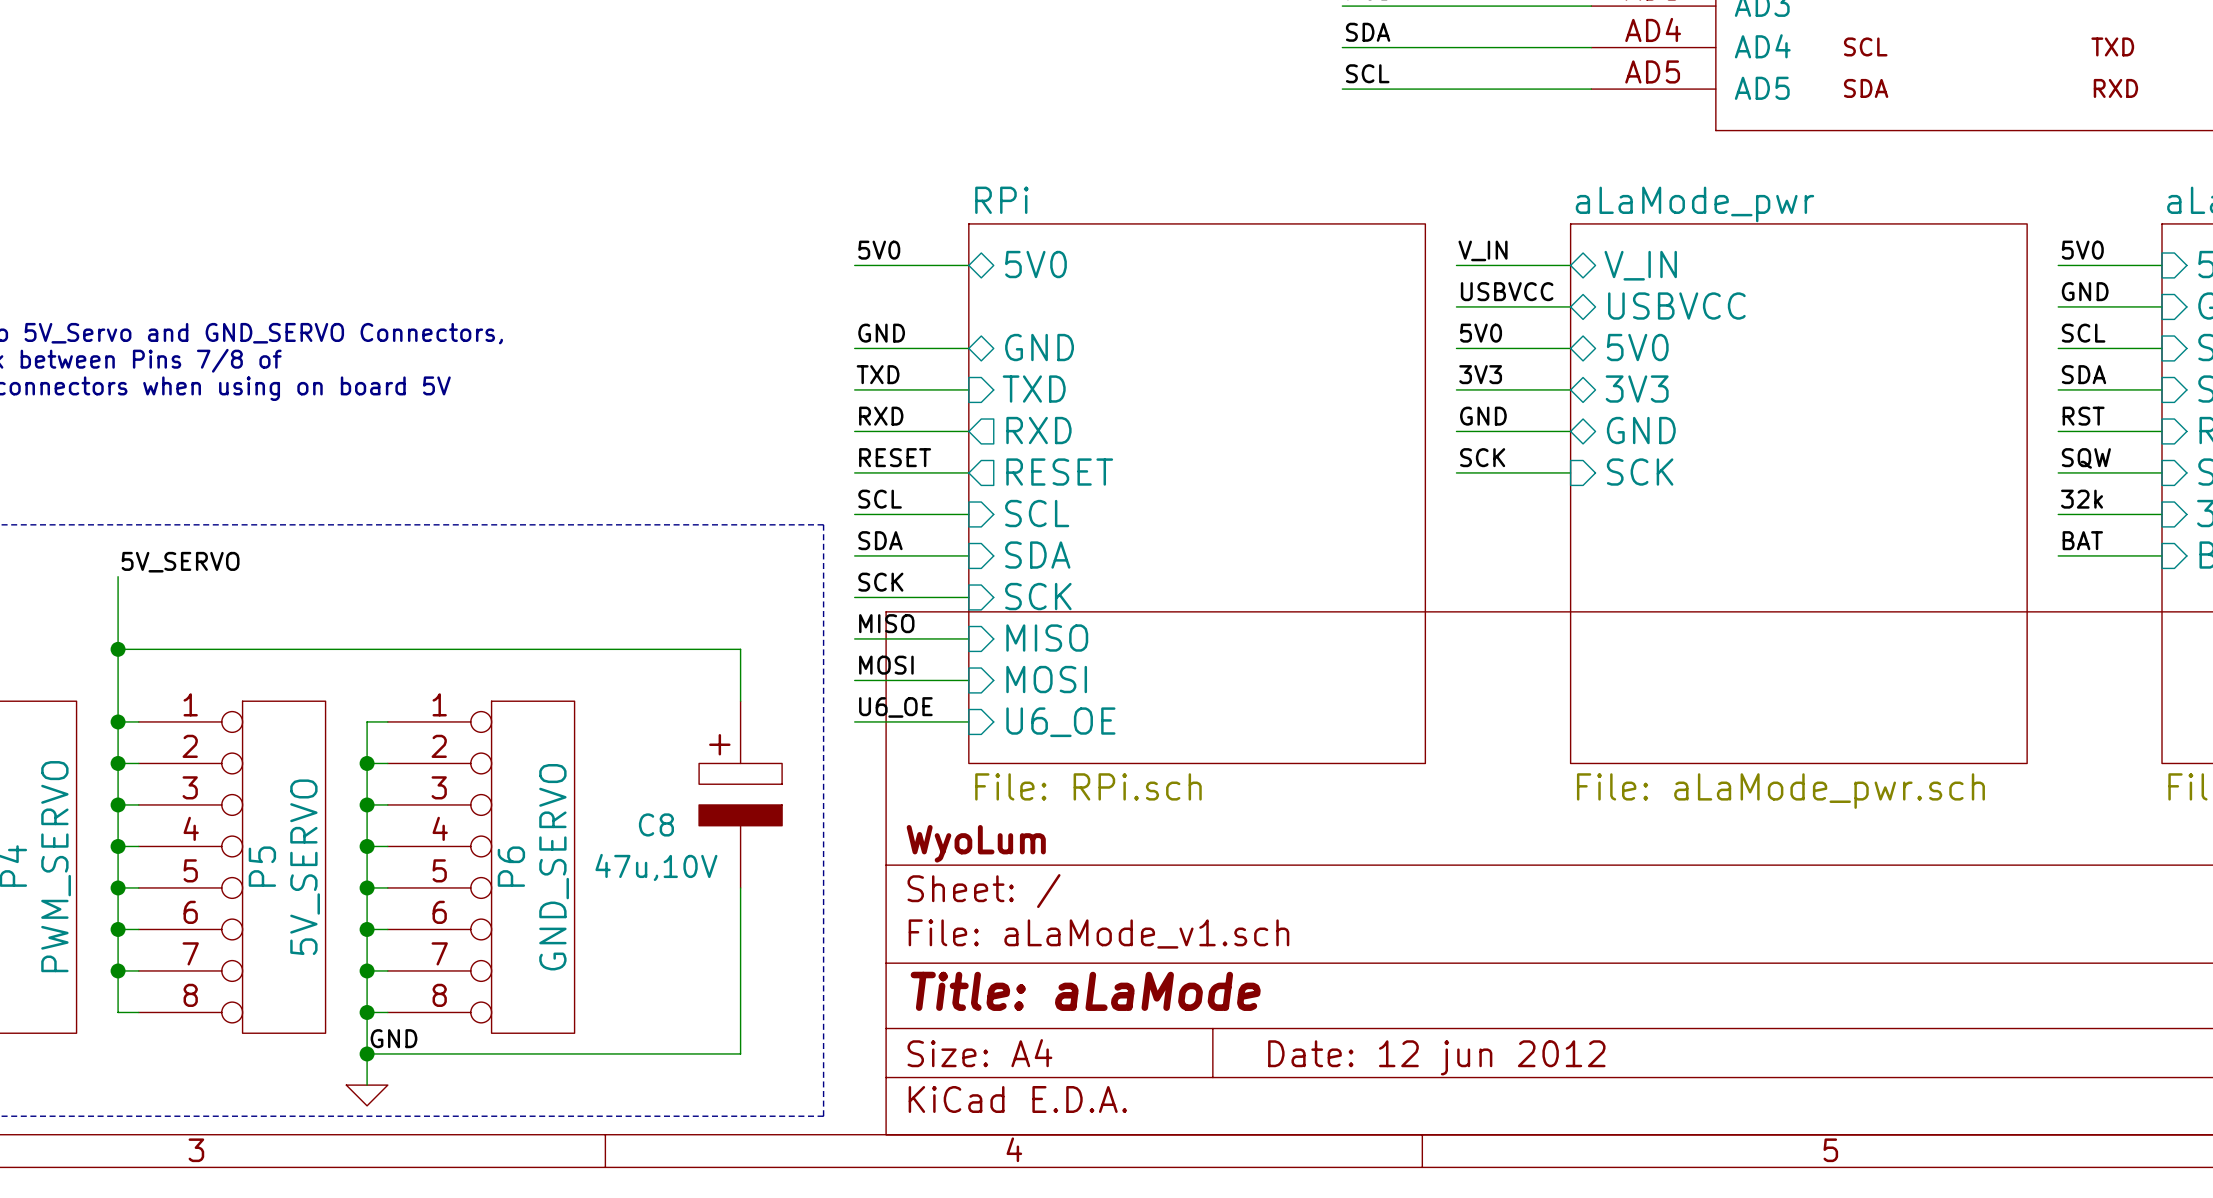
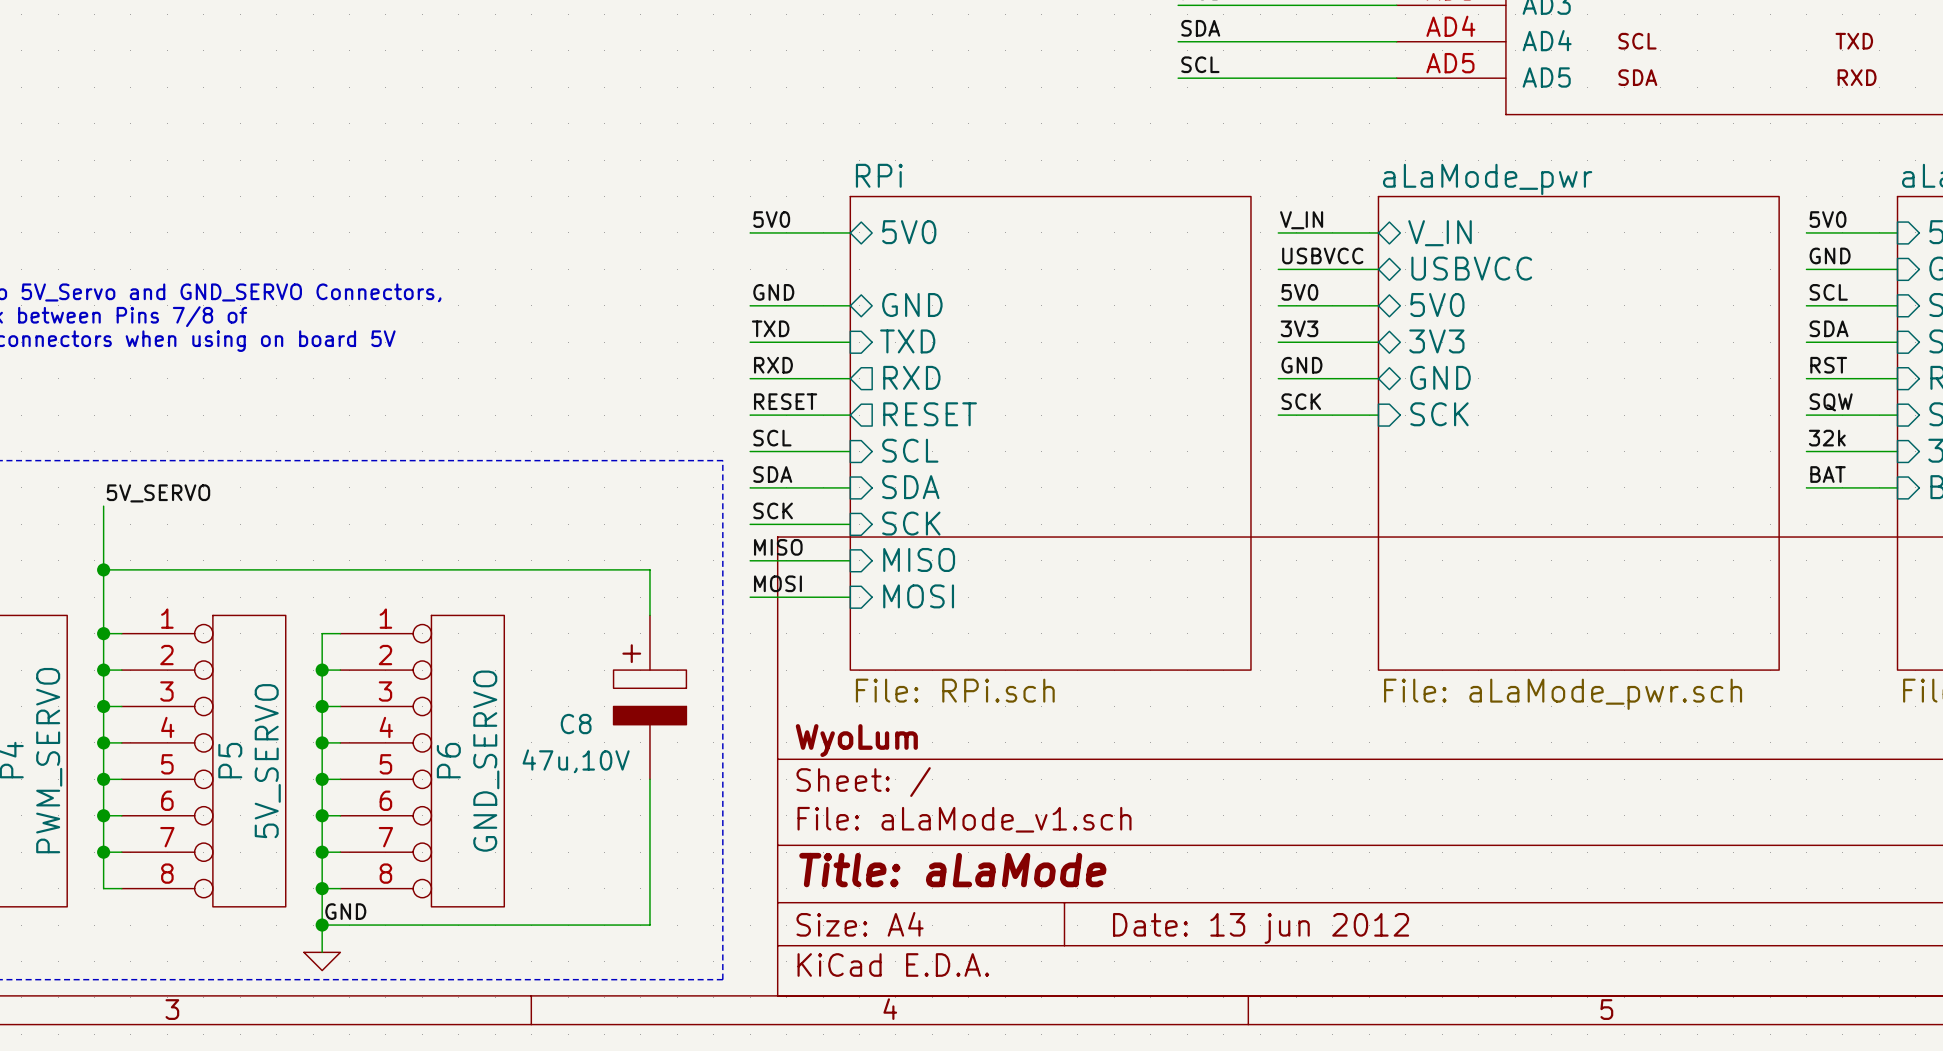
label: U6_OE (895, 707) -> none
wire: (854, 721) (968, 721) -> none
sheet pin: U6_OE (1060, 722) -> none
title block: Date: 12 jun 2012 (1436, 1057) -> Date: 13 jun 2012 (1261, 928)

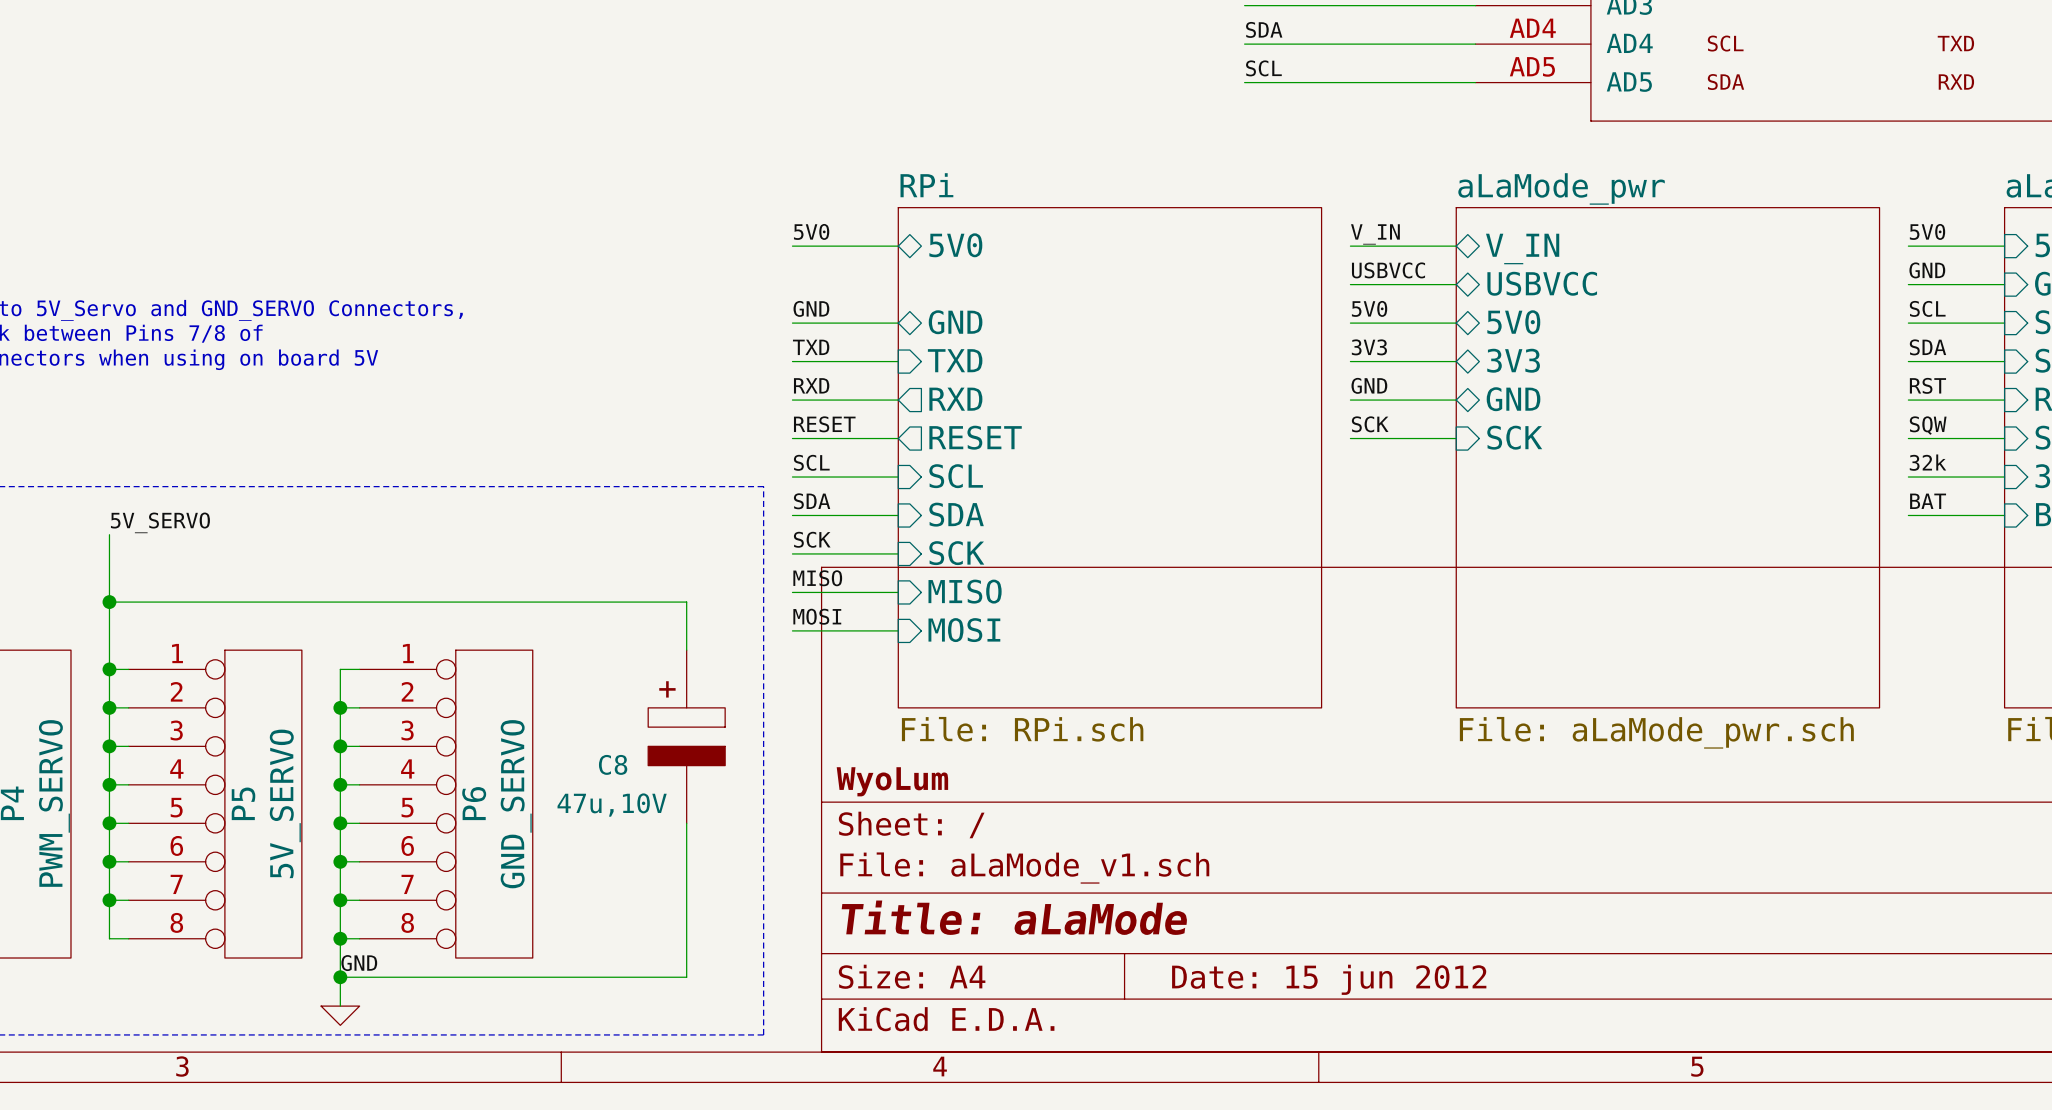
title block: Date: 13 jun 2012 (1261, 928) -> Date: 15 jun 2012 (1329, 979)

